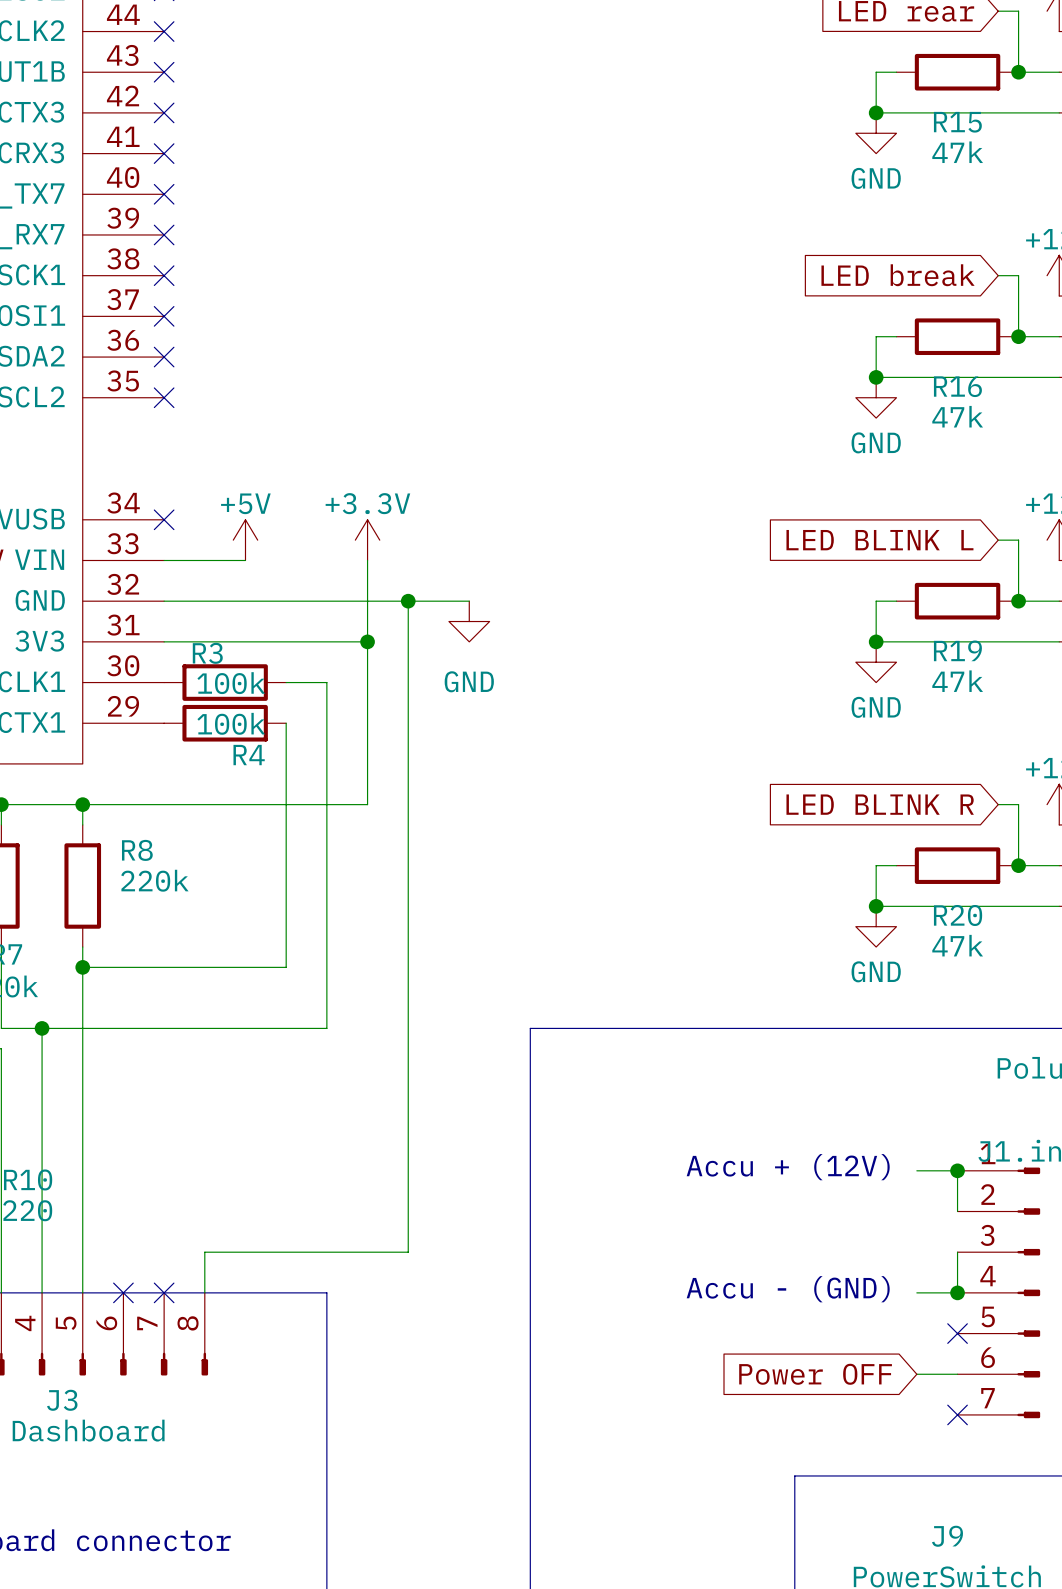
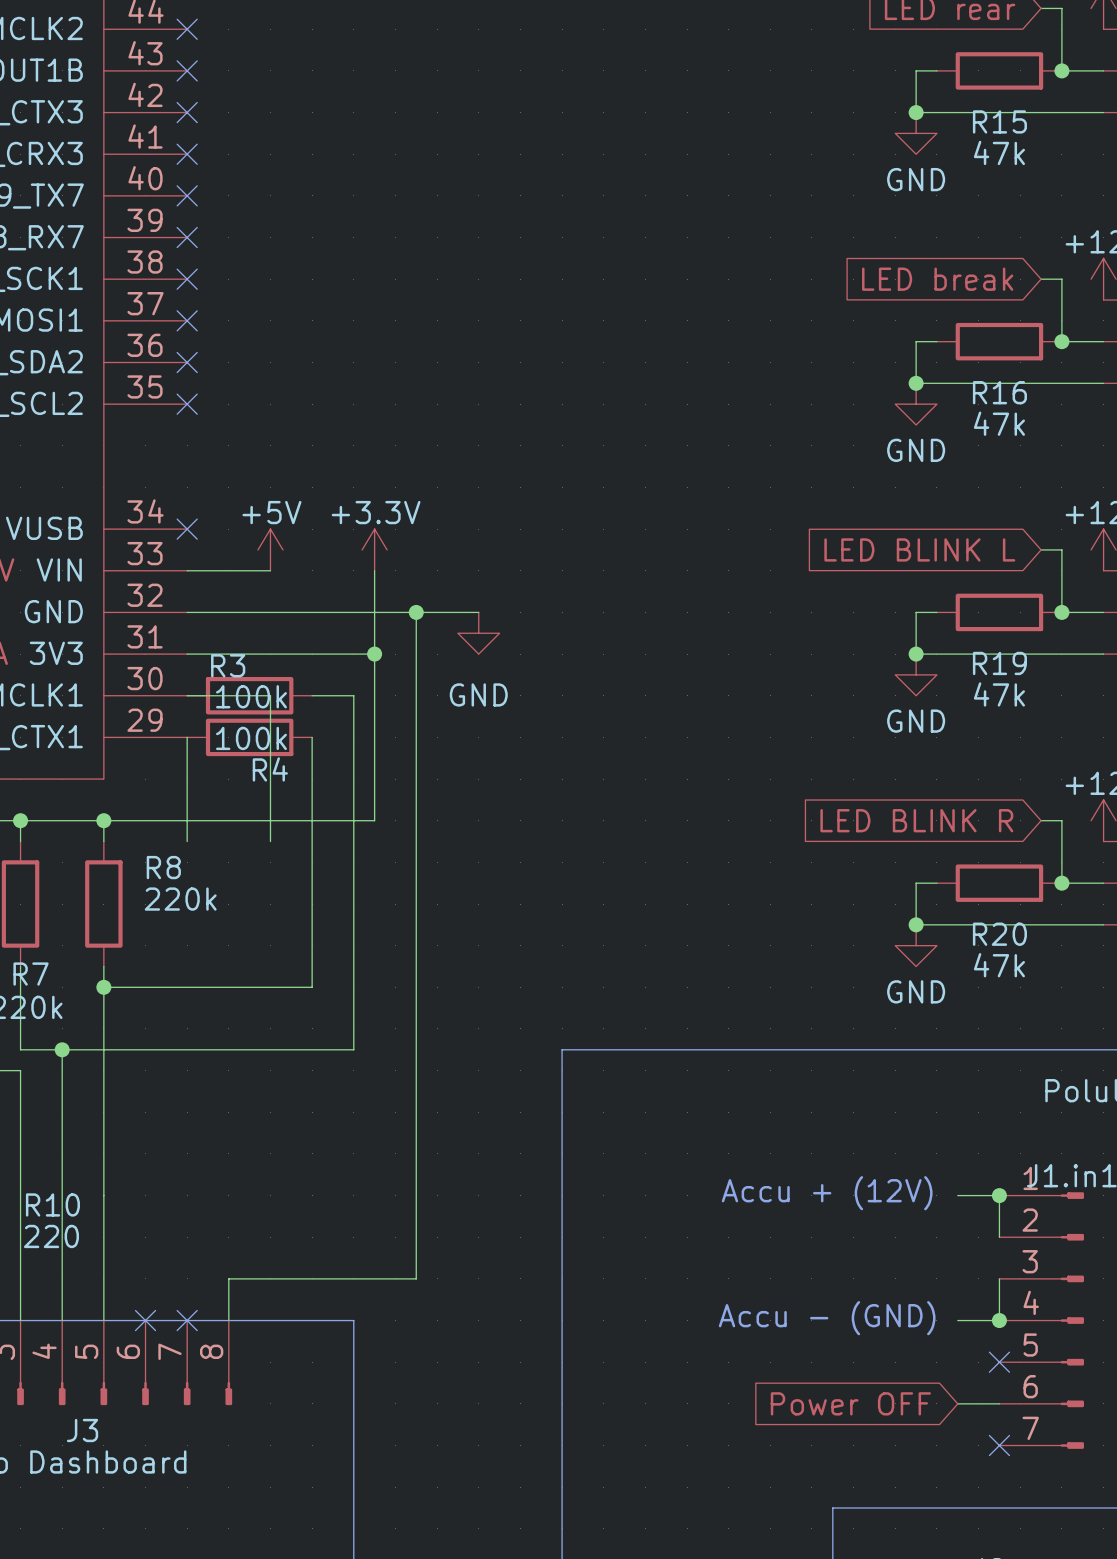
power symbol position: +3.3V (367, 540) -> +3.3V (374, 549)
wire: (367, 560) (367, 804) (347, 804) -> (374, 570) (374, 820)
wire: (408, 601) (408, 1252) (387, 1252) -> (416, 612) (416, 1278)
junction position: (408, 601) -> (416, 612)
wire: (448, 601) (469, 601) -> none
power symbol position: GND (469, 621) -> GND (478, 633)
wire: (347, 641) (367, 641) -> none
junction position: (367, 641) -> (374, 654)
wire: none -> (187, 695) (270, 695) (270, 841)
wire: none -> (187, 737) (187, 841)

